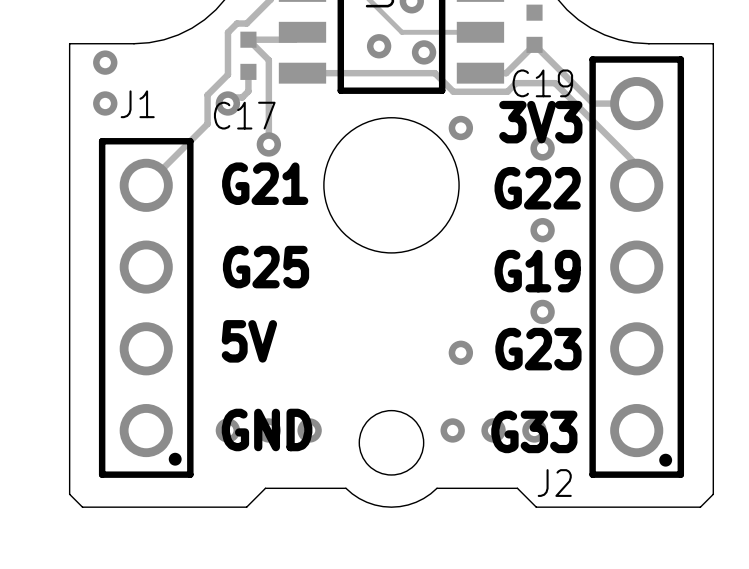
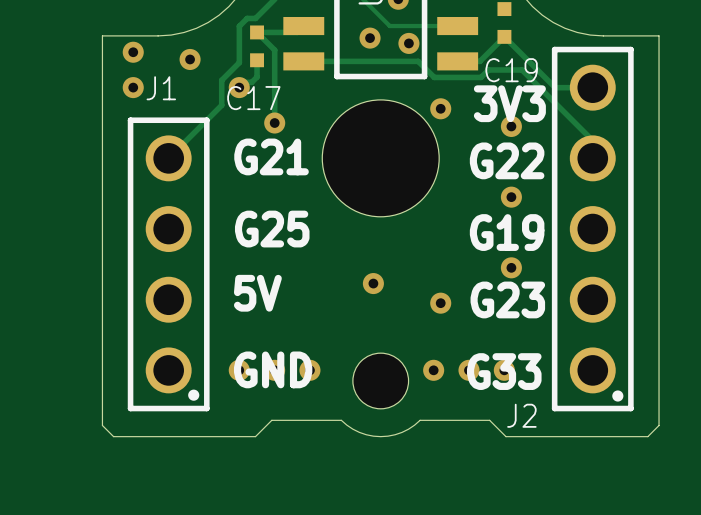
via: none -> (190, 59)
via: none -> (373, 283)

